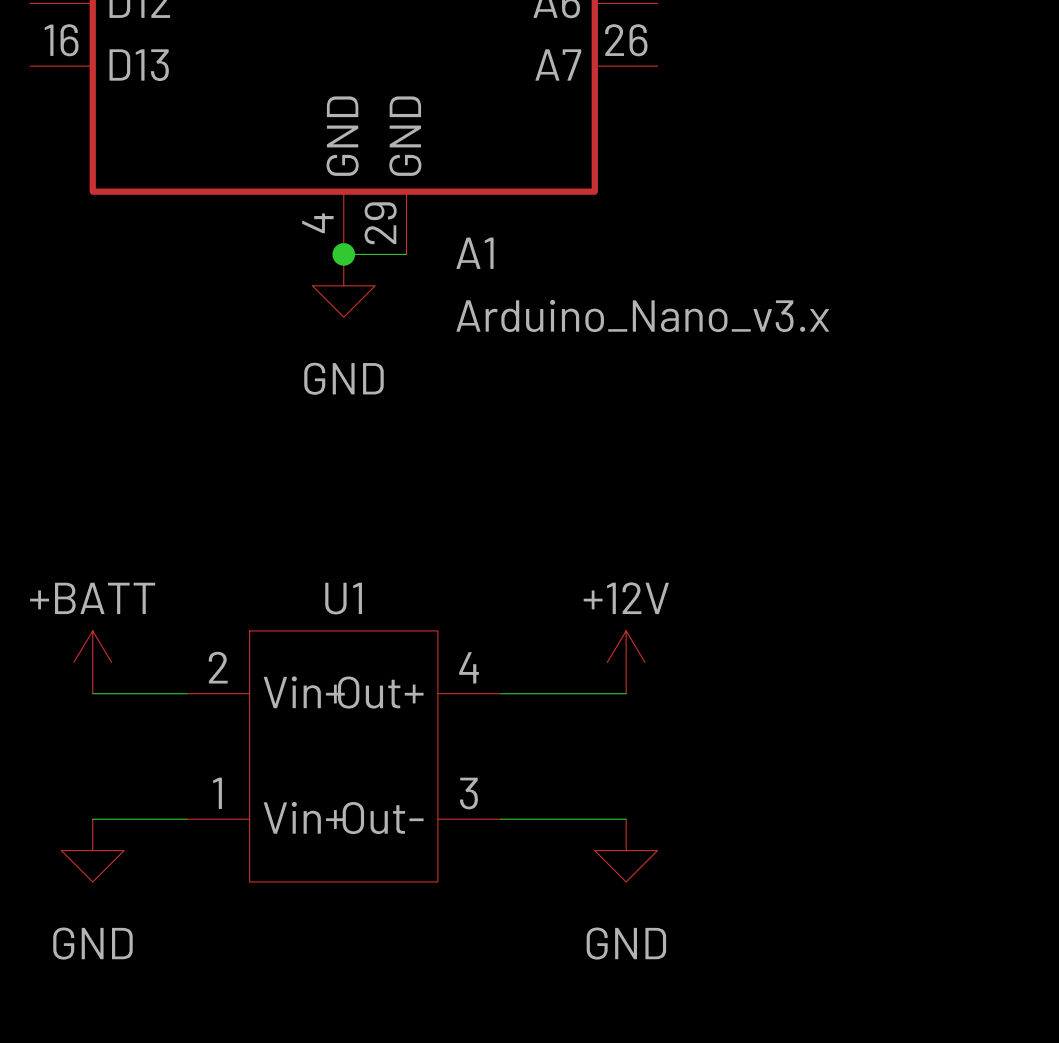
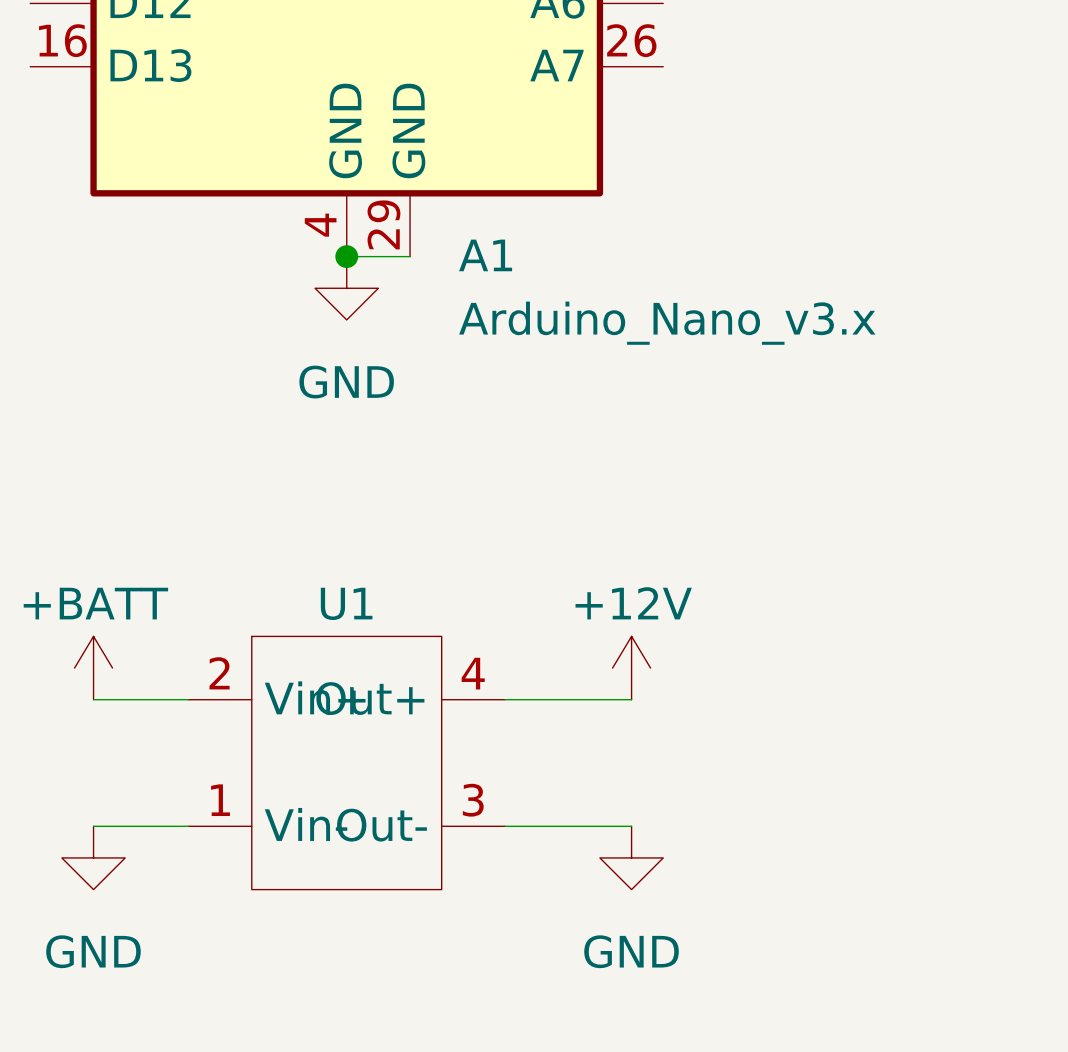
U1 pin name: Vin+ (304, 817) -> Vin- (306, 824)

